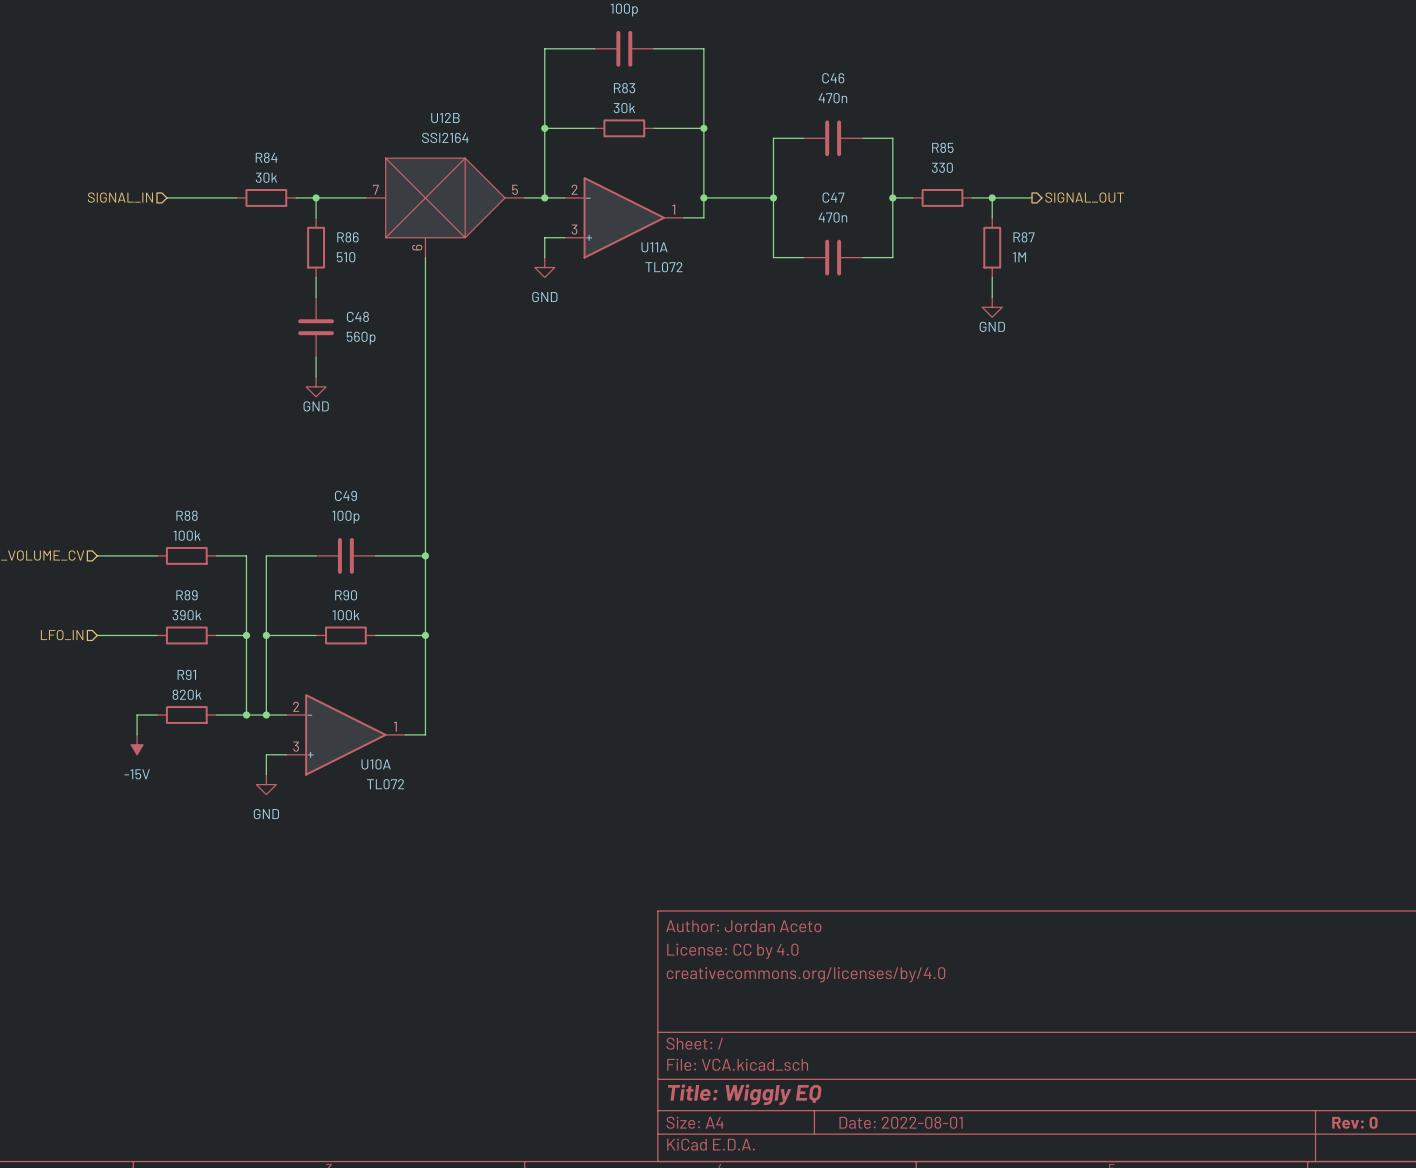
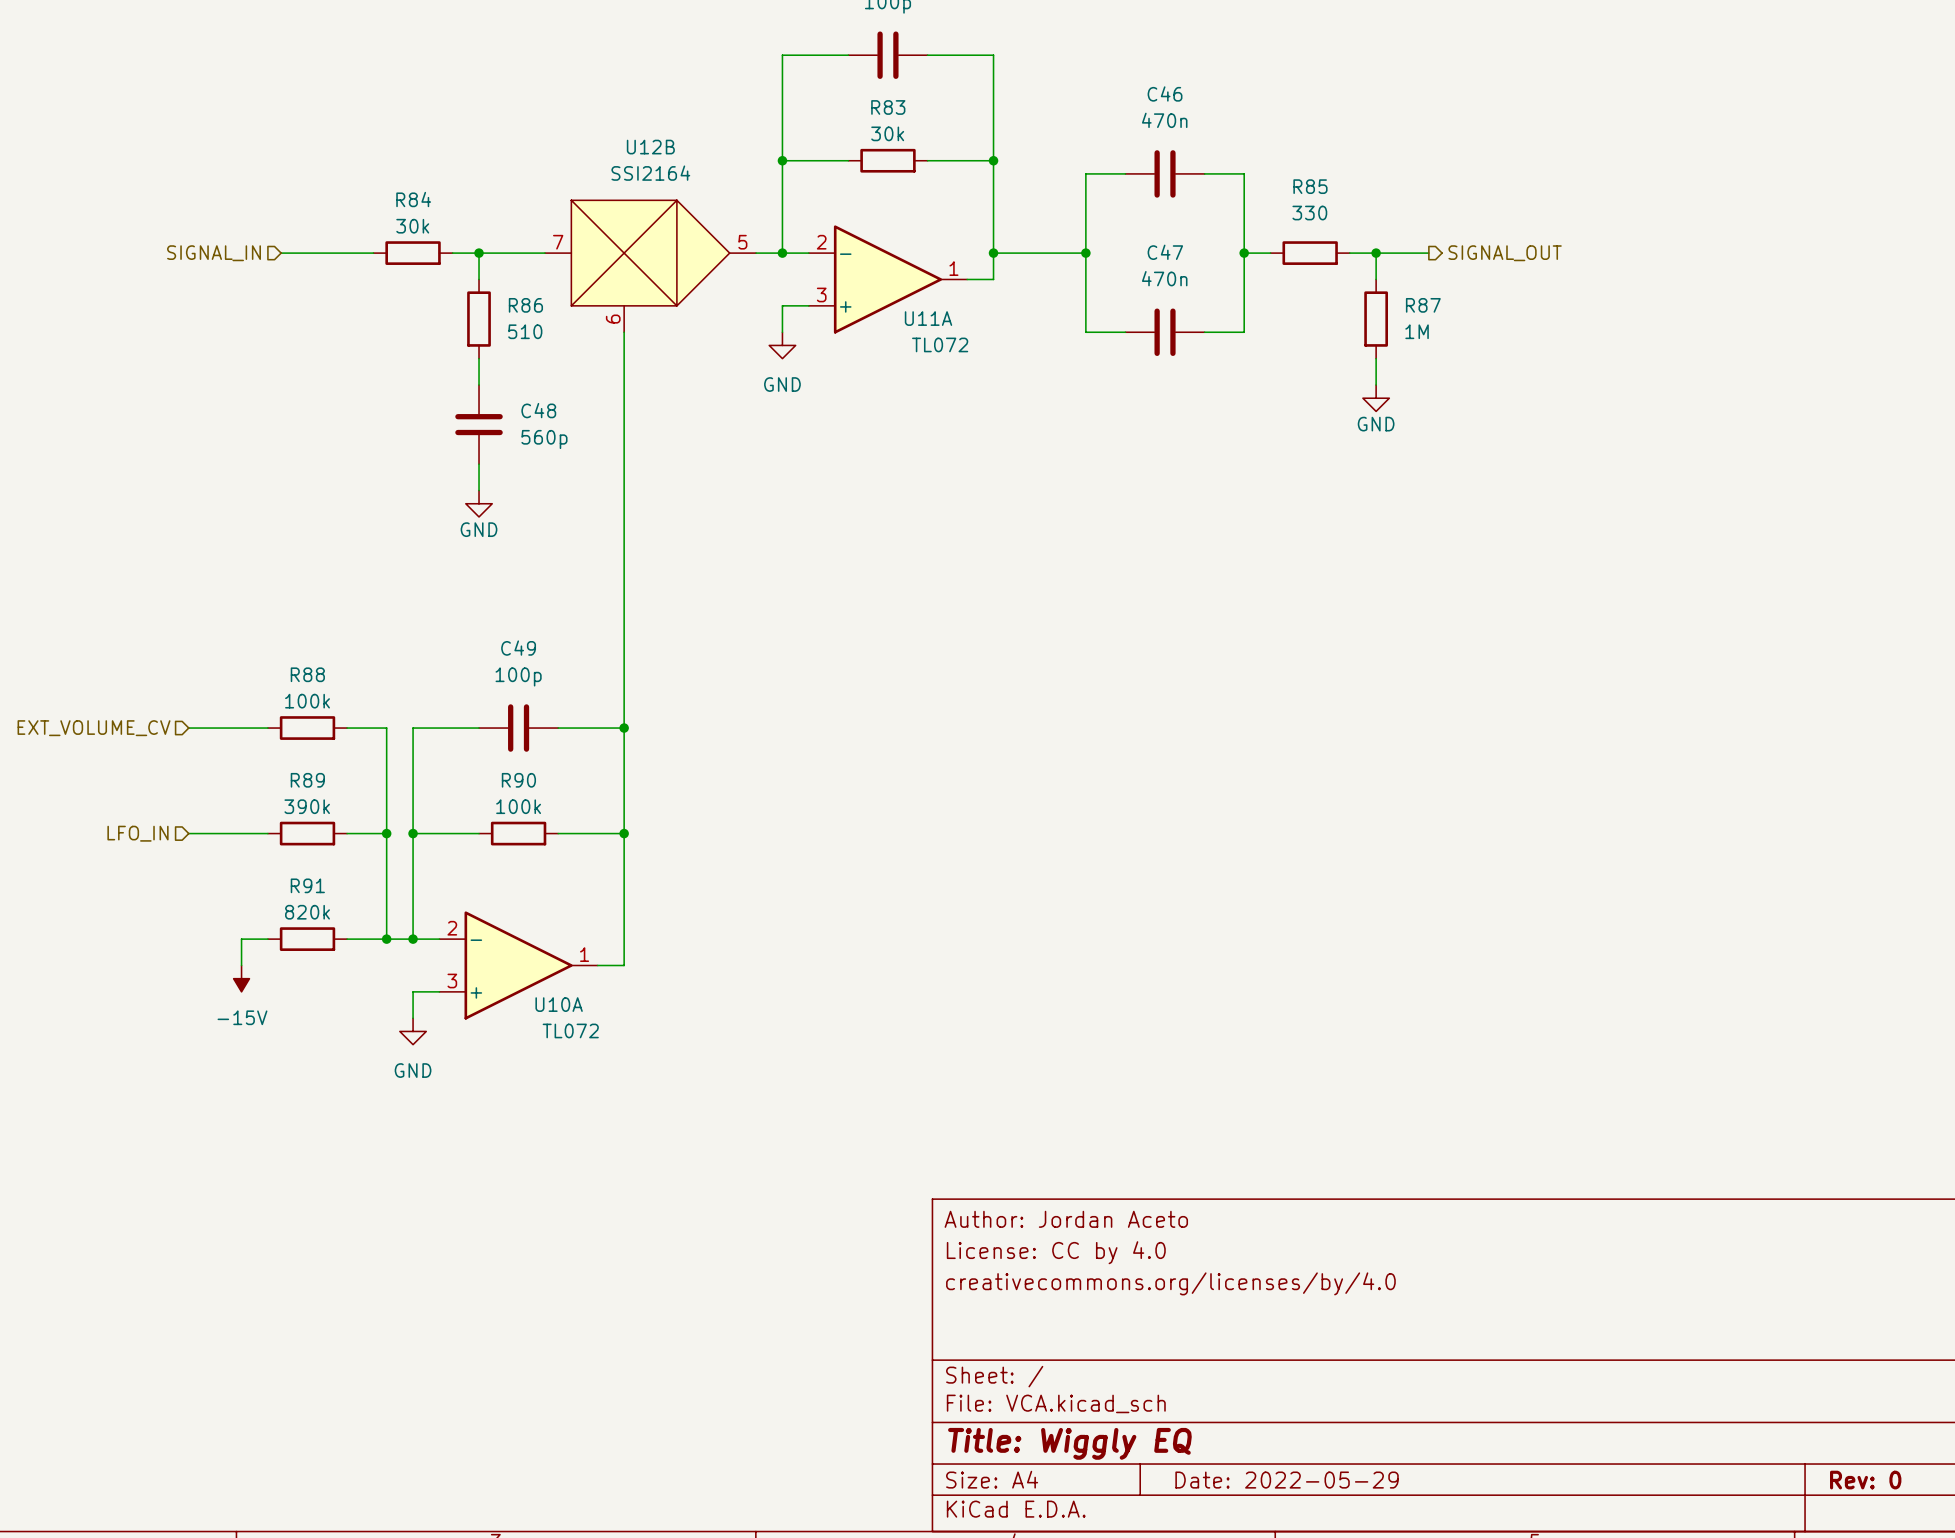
title block: Date: 2022-08-01 (901, 1122) -> Date: 2022-05-29 (1287, 1480)

